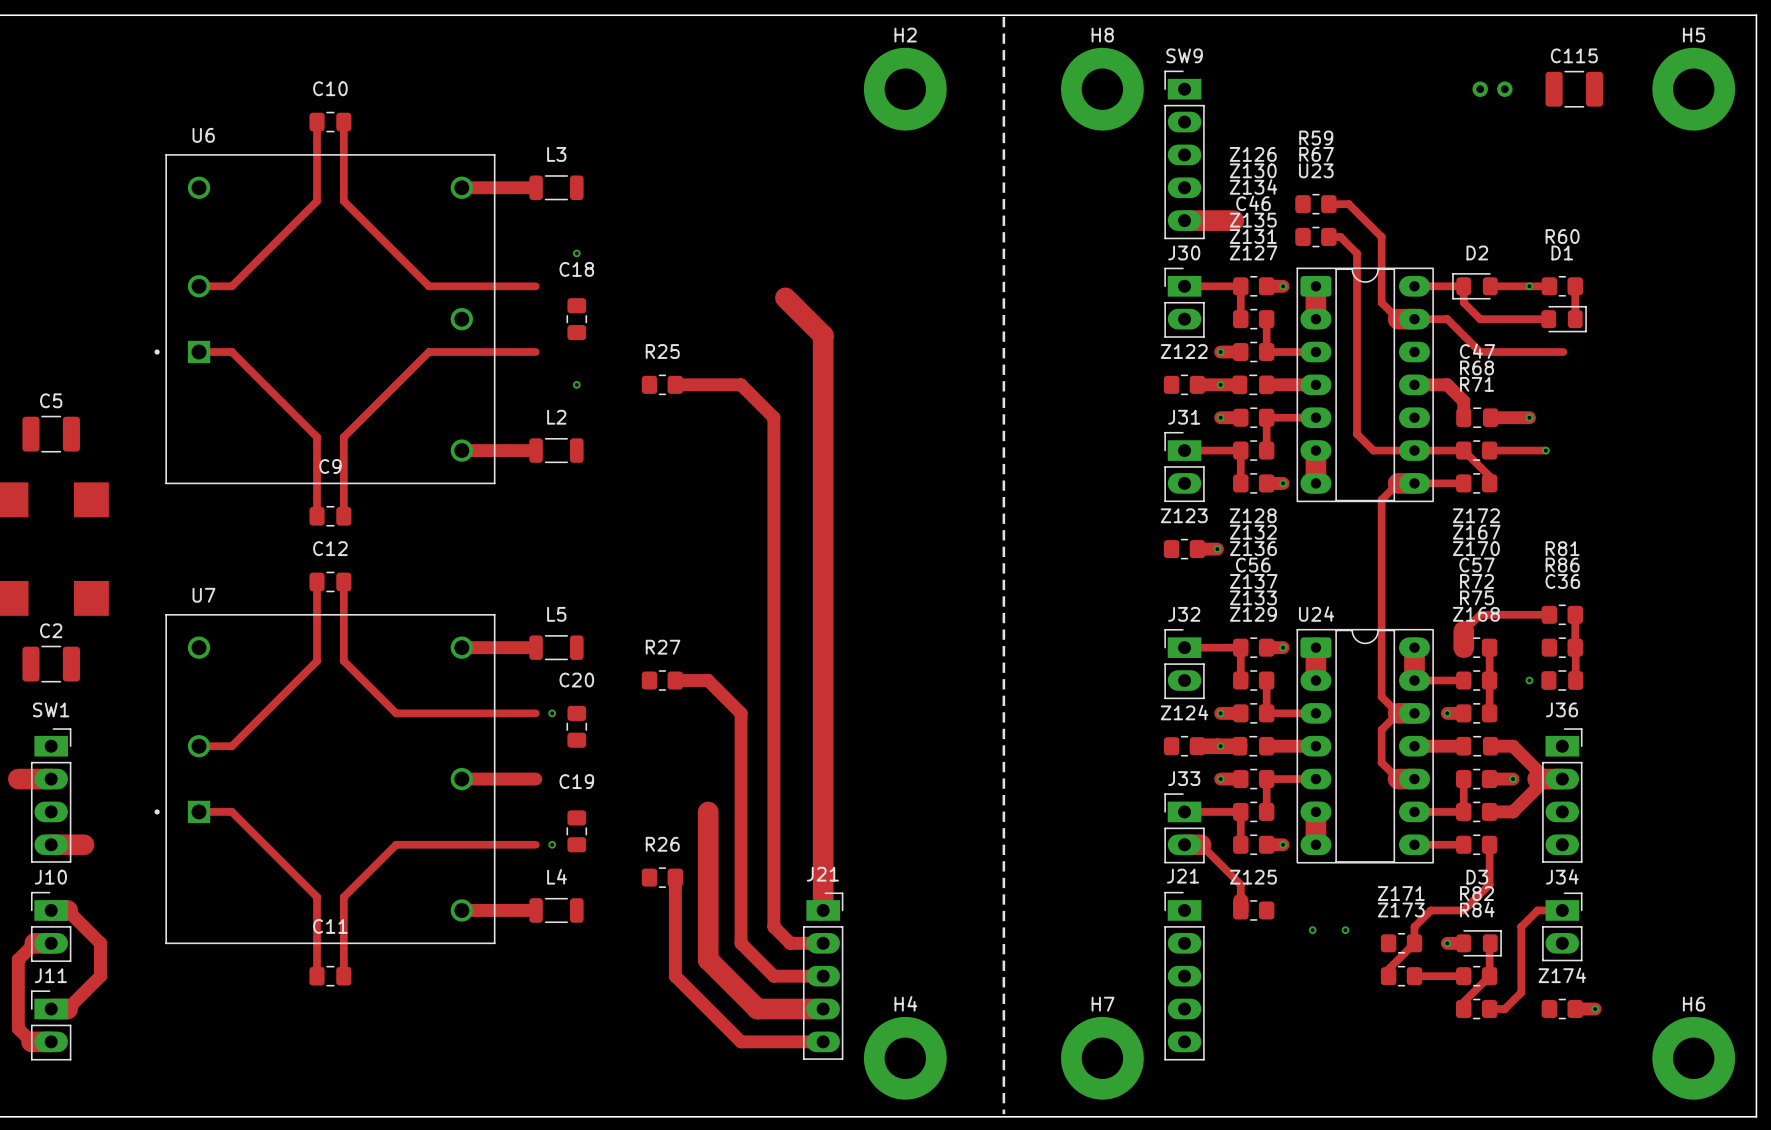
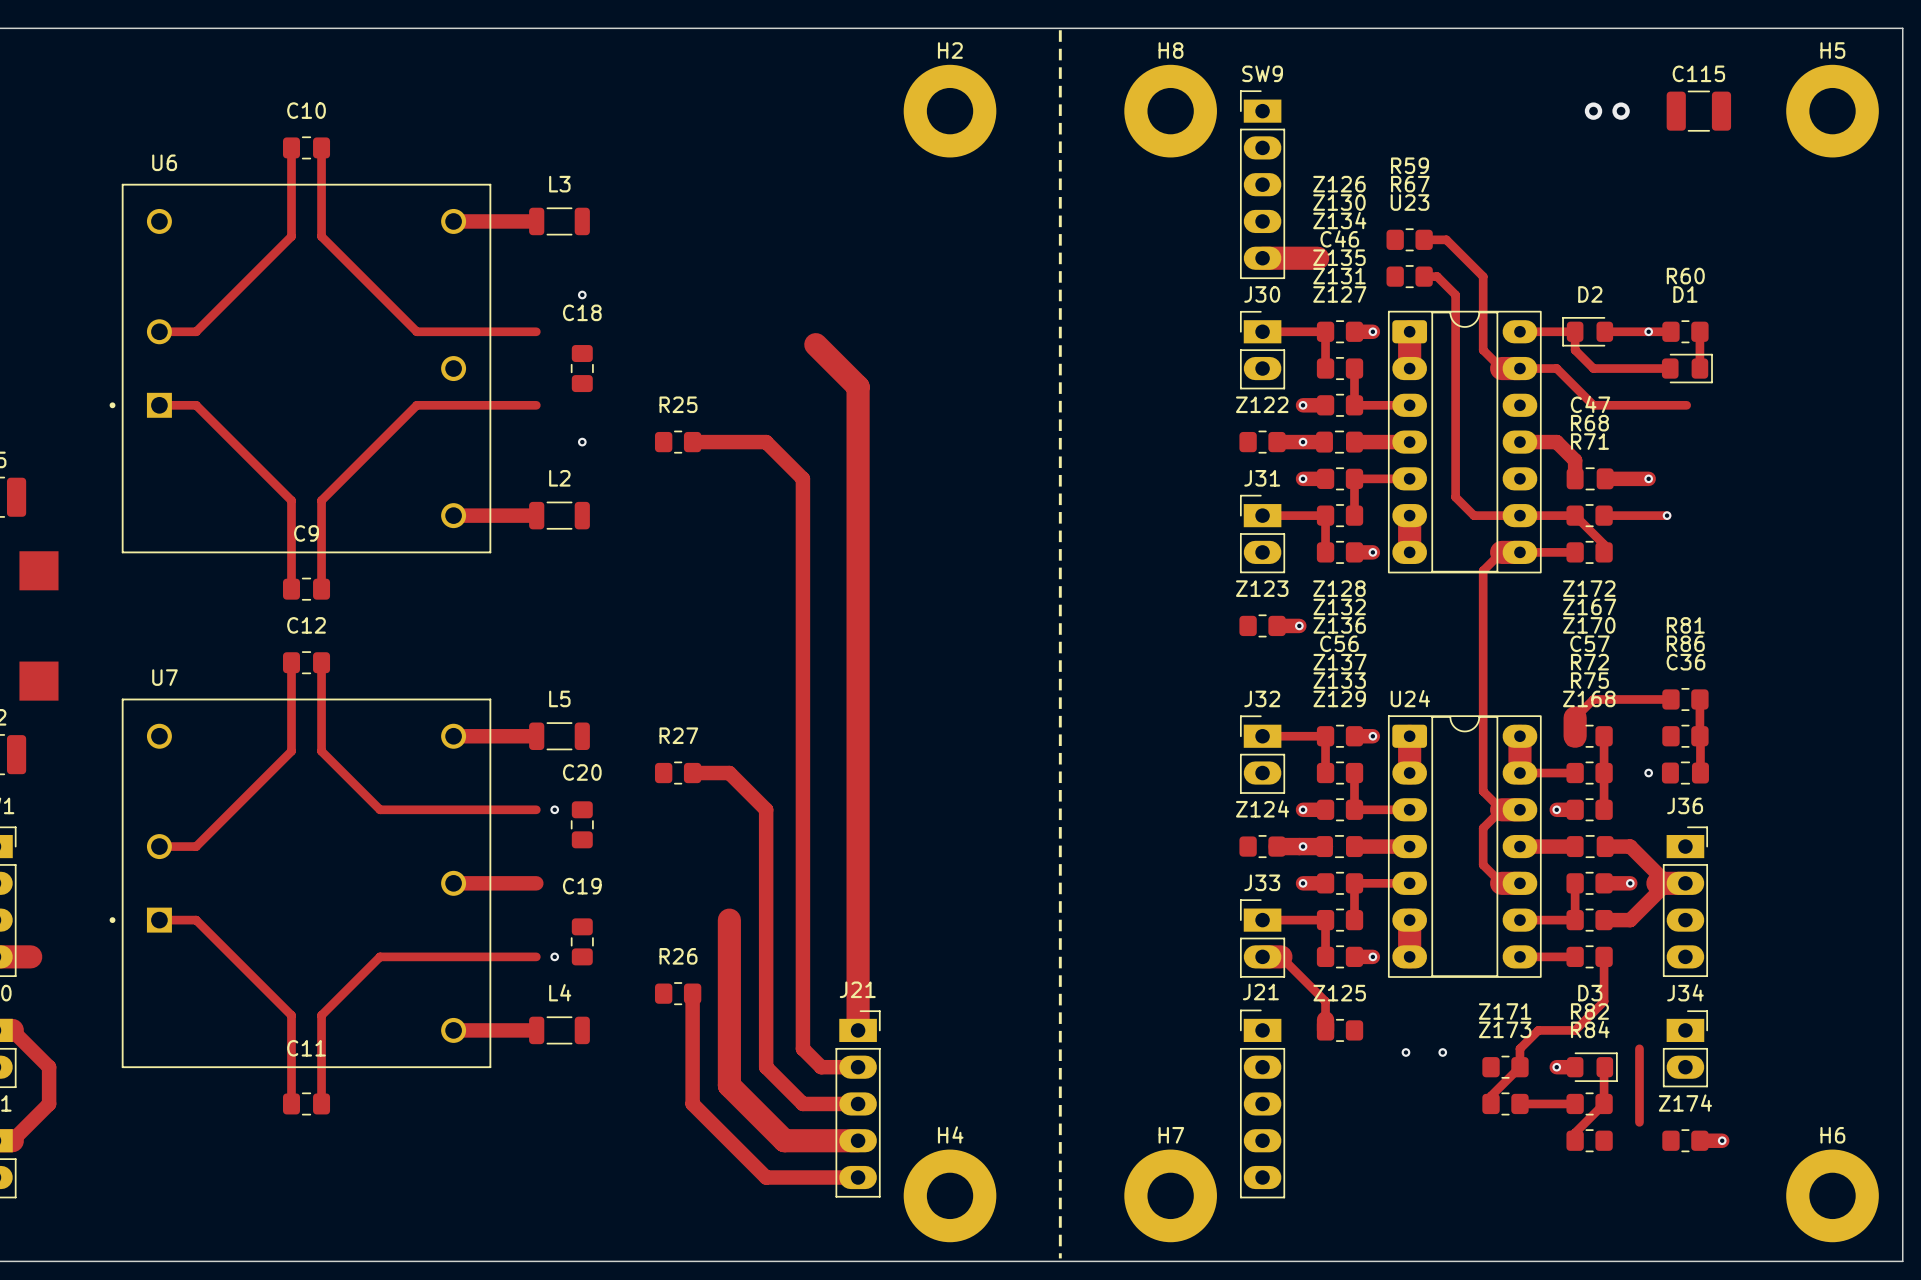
track: (1562, 910) (1537, 910) (1521, 926) -> none
track: (1521, 992) (1504, 1009) (1489, 1009) -> none

